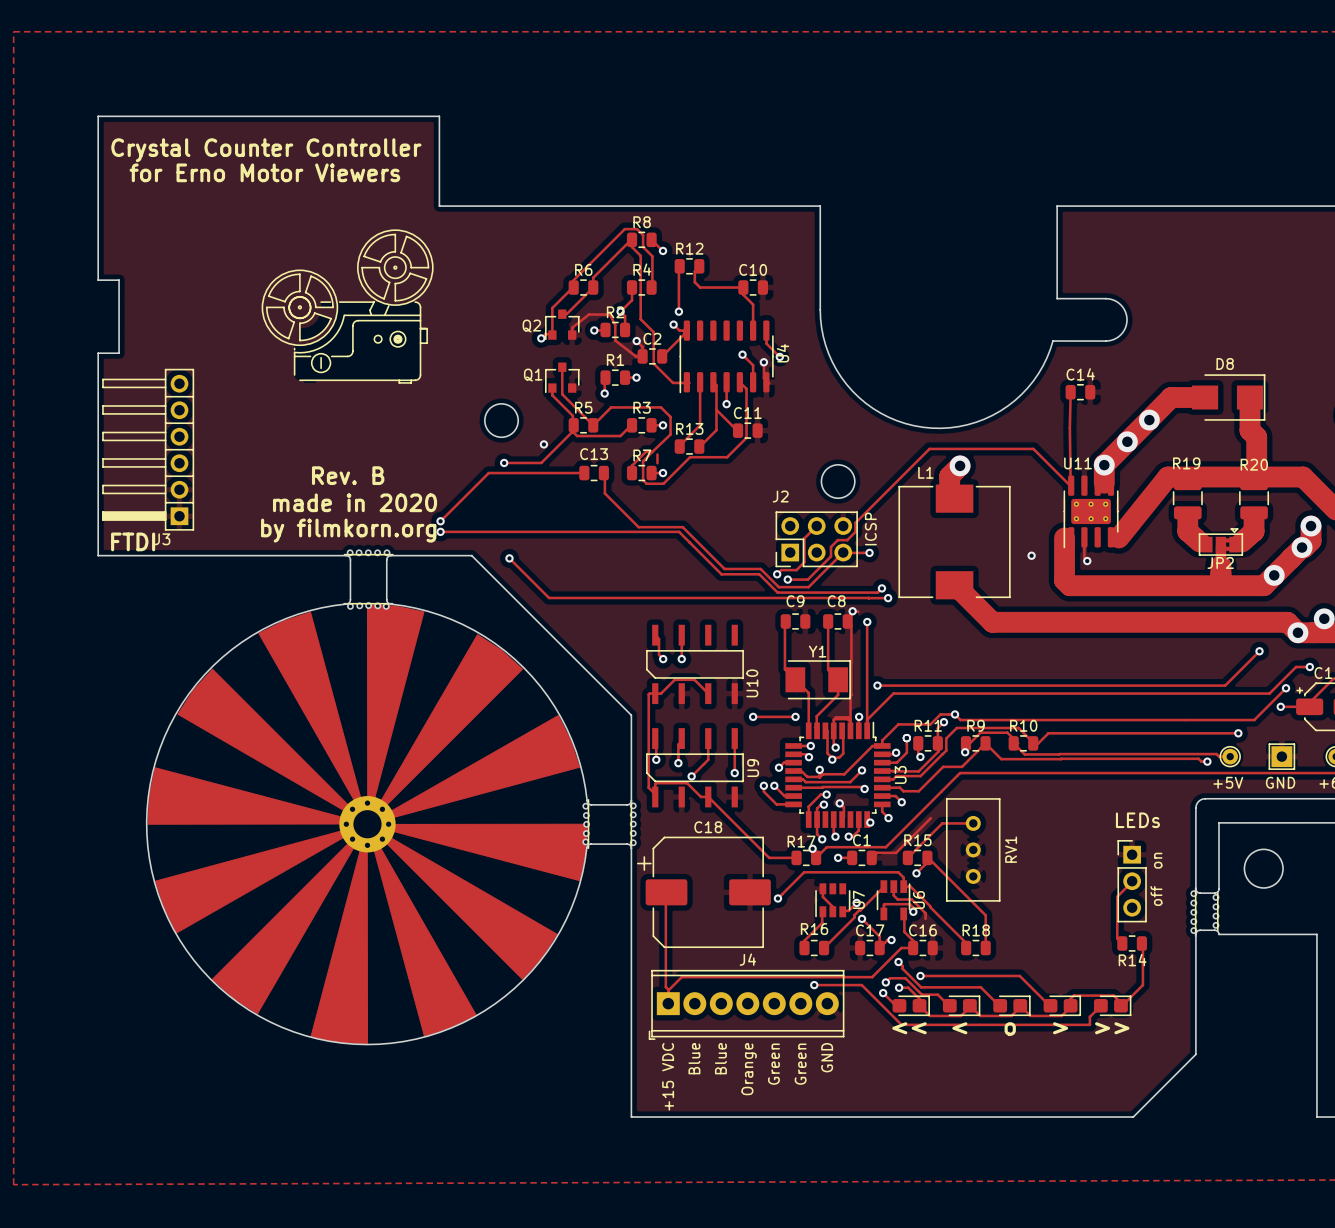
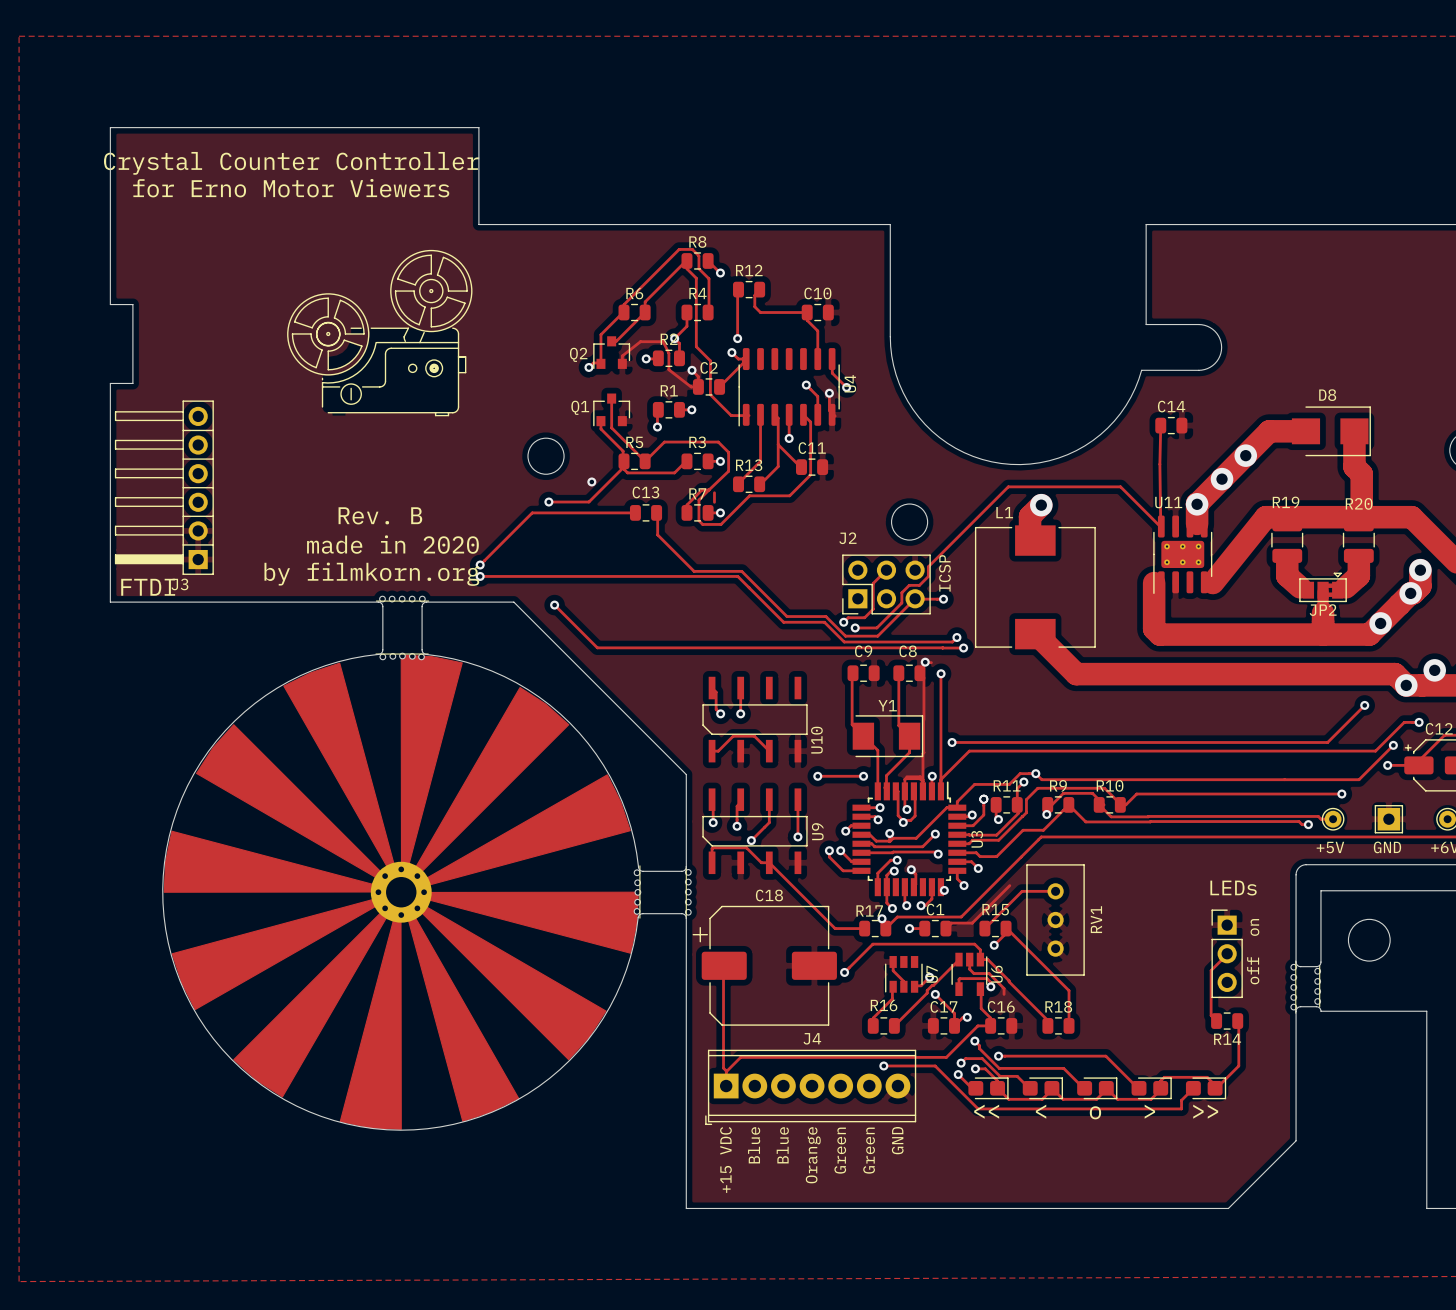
track: (1084, 537) (1084, 558) (1087, 561) -> none
via: (1031, 555) -> none
via: (1087, 561) -> none
track: (655, 693) (648, 694) (648, 787) (655, 794) -> none

